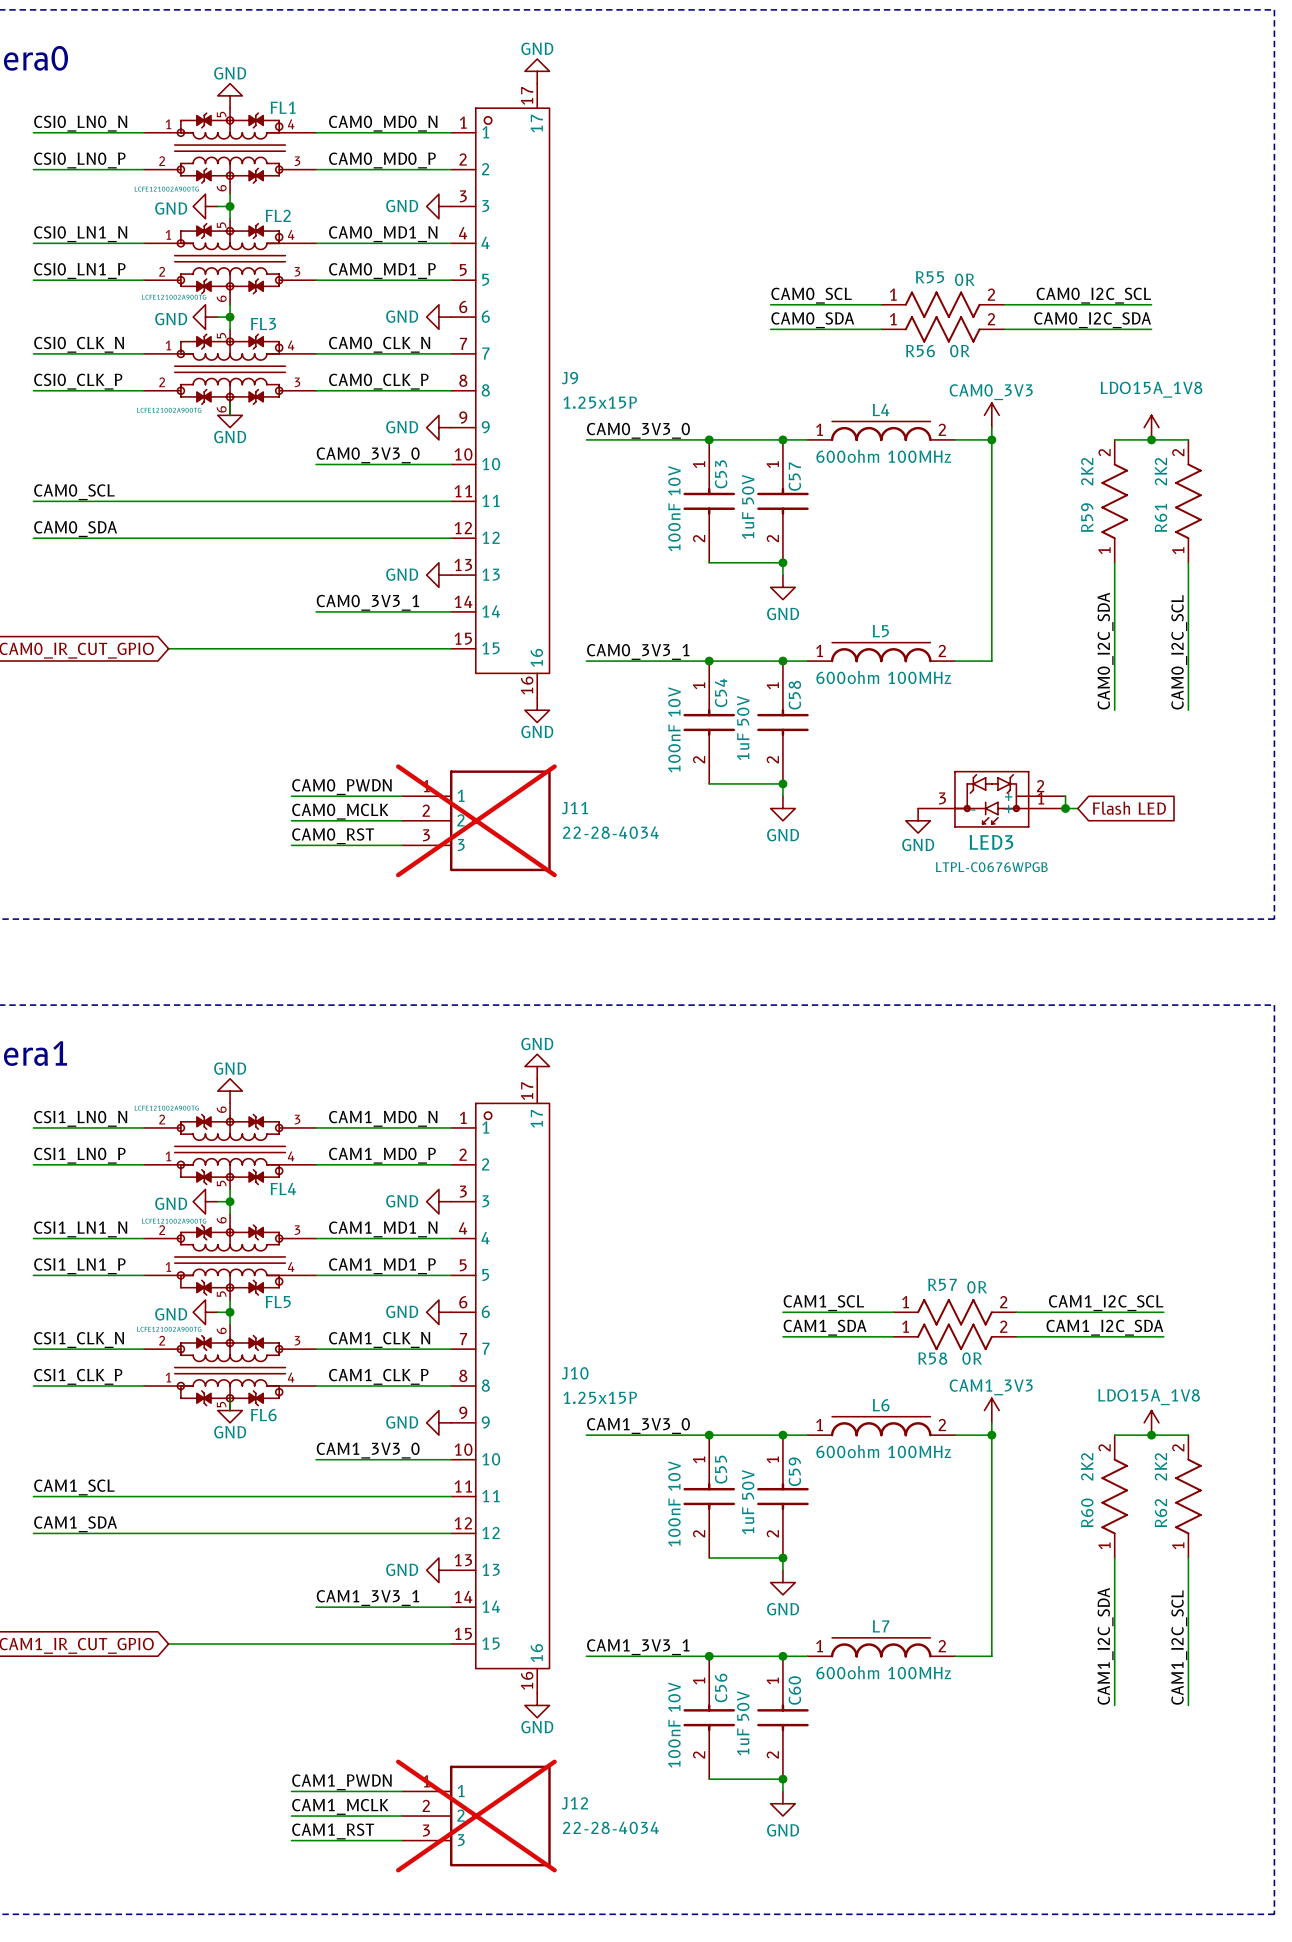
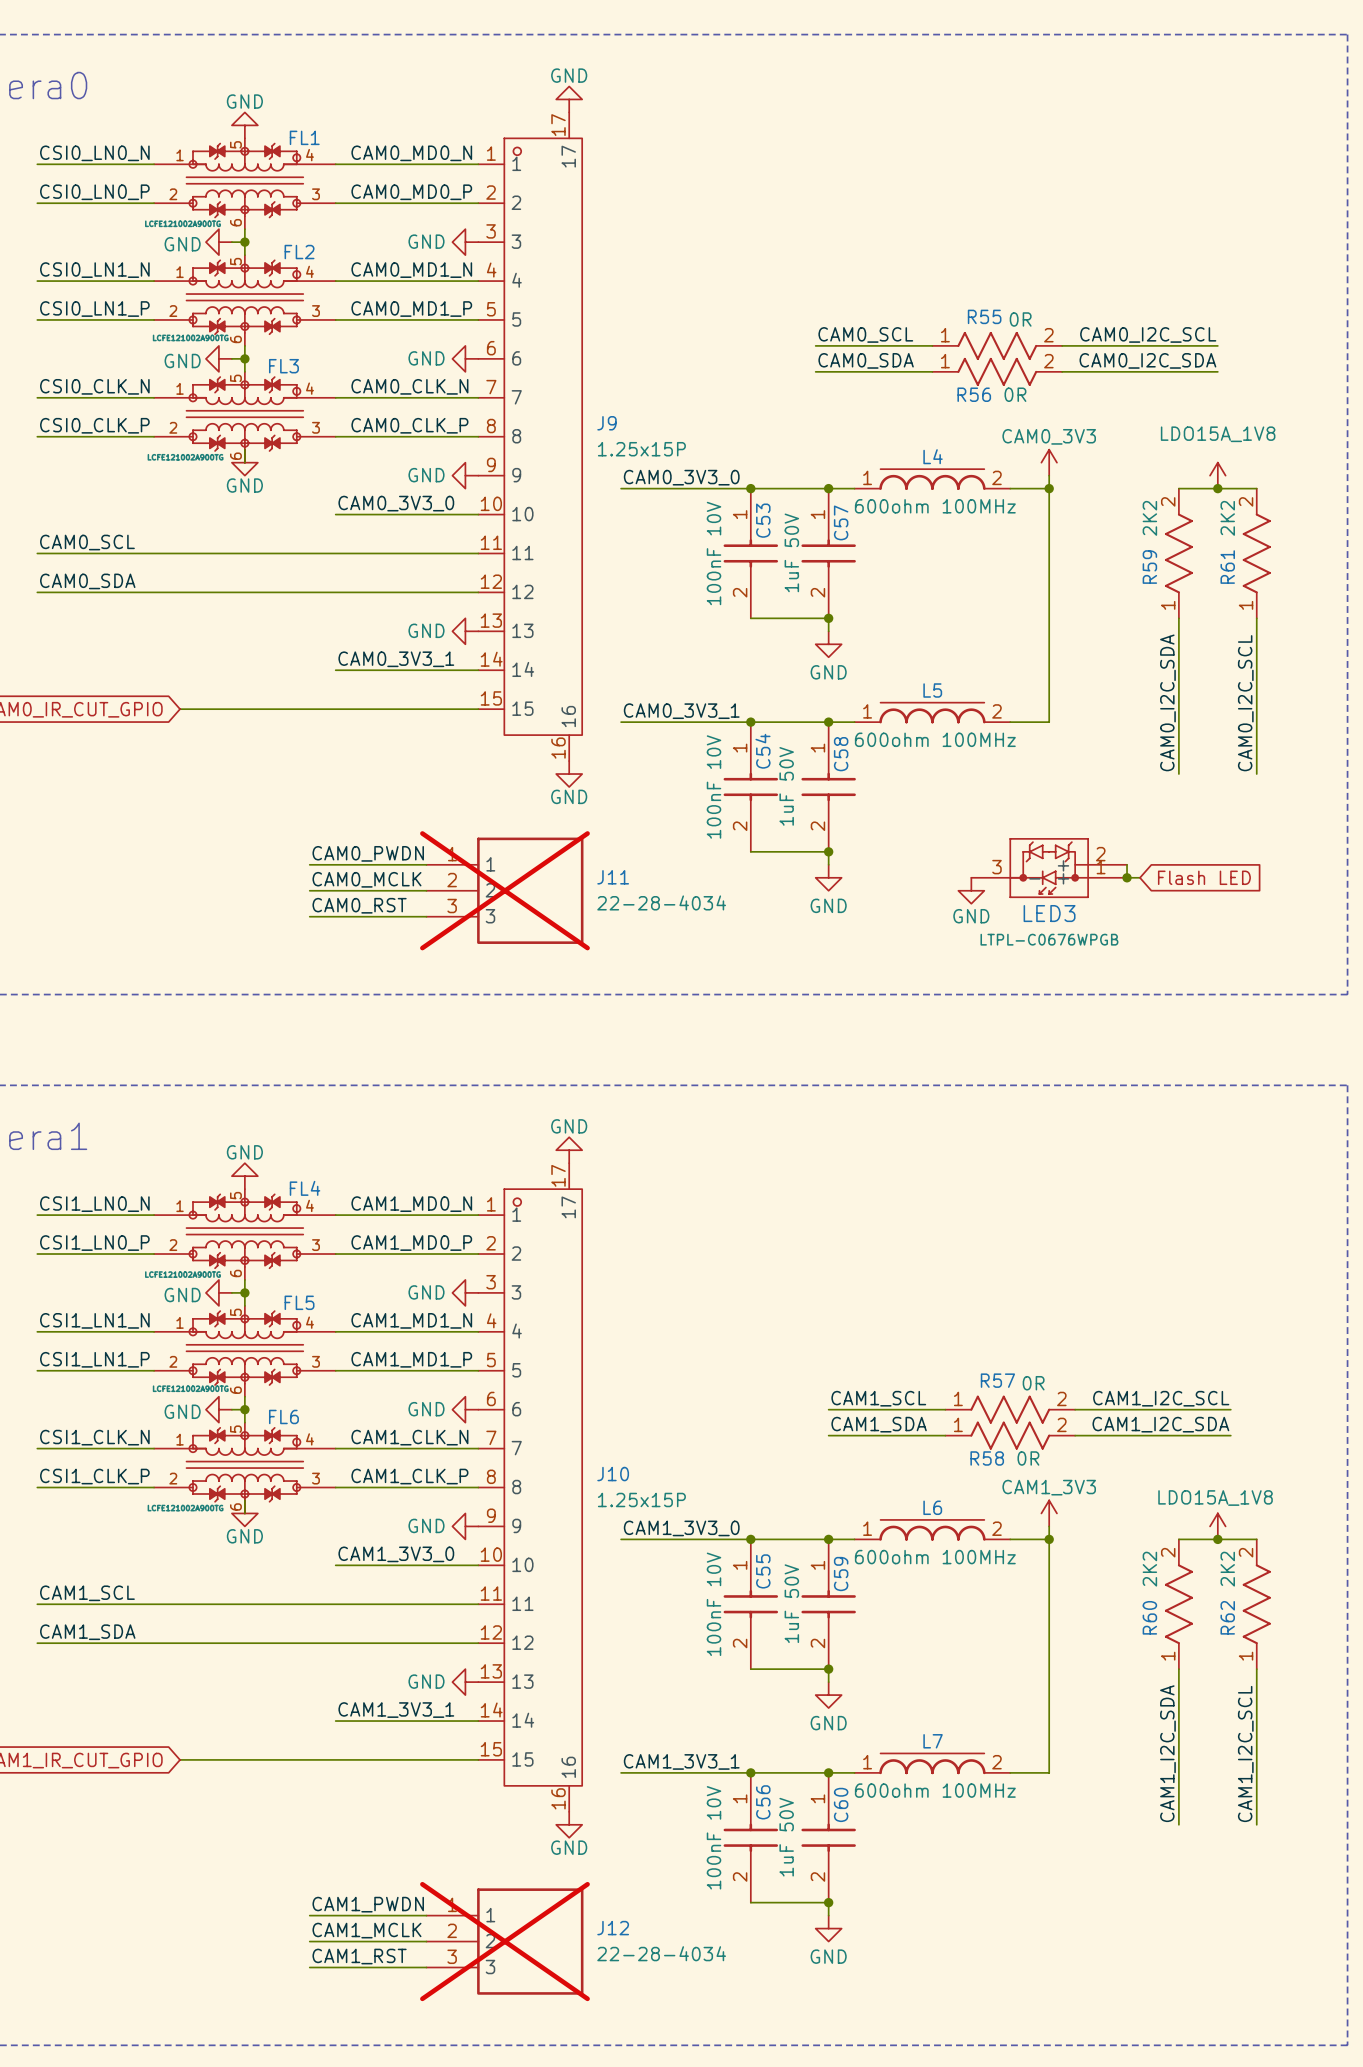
FL4 flip: as is (230, 1149) -> up-down (244, 1231)
FL5 flip: as is (230, 1260) -> up-down (244, 1348)
FL6 flip: as is (230, 1370) -> up-down (244, 1464)

